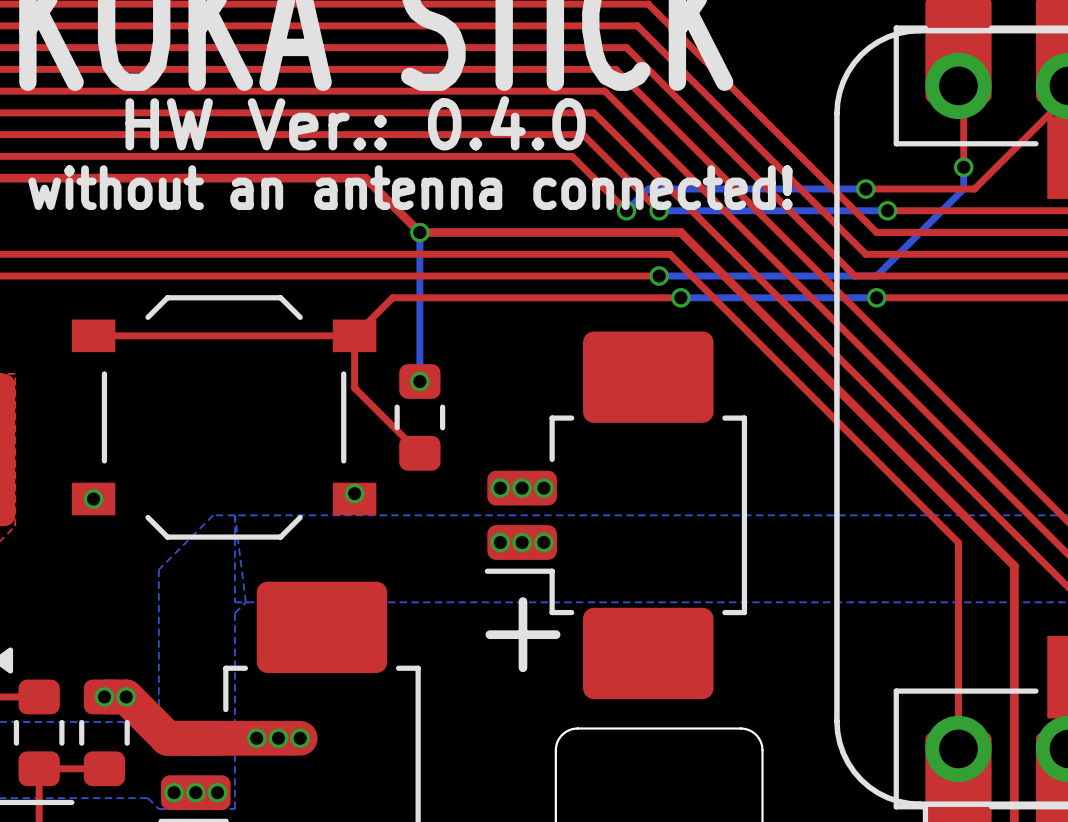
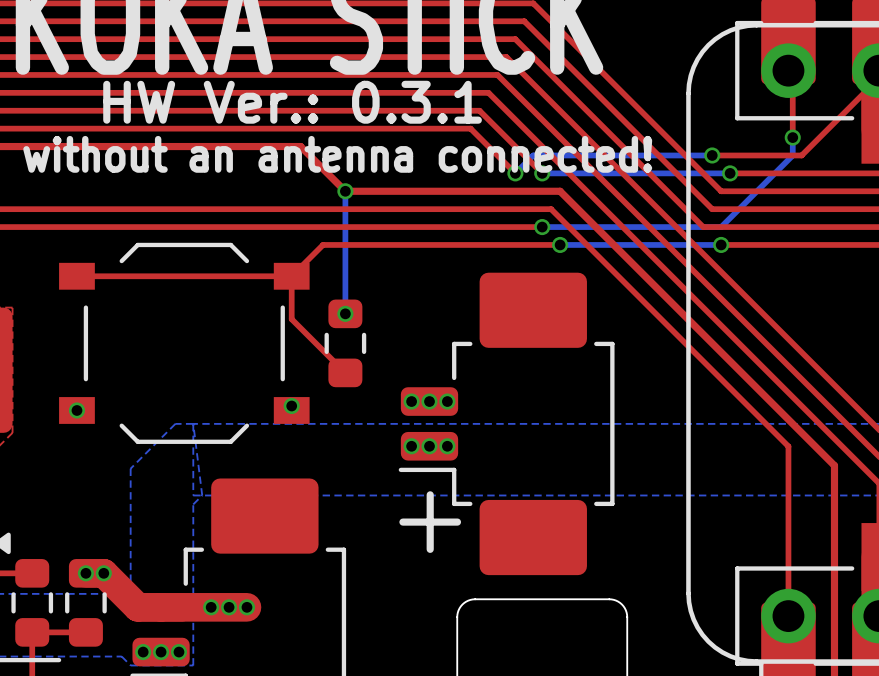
text: HW Ver.: 0.4.0 (355, 123) -> HW Ver.: 0.3.1 (292, 102)

